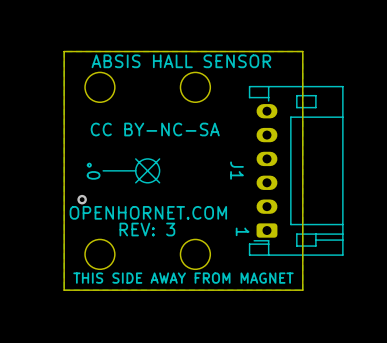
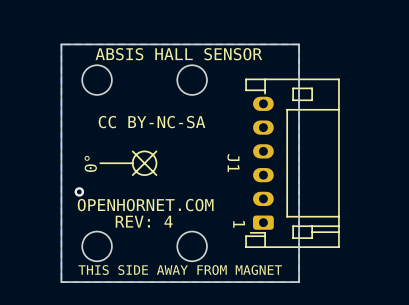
text: REV: 3 (147, 229) -> REV: 4 (144, 221)

